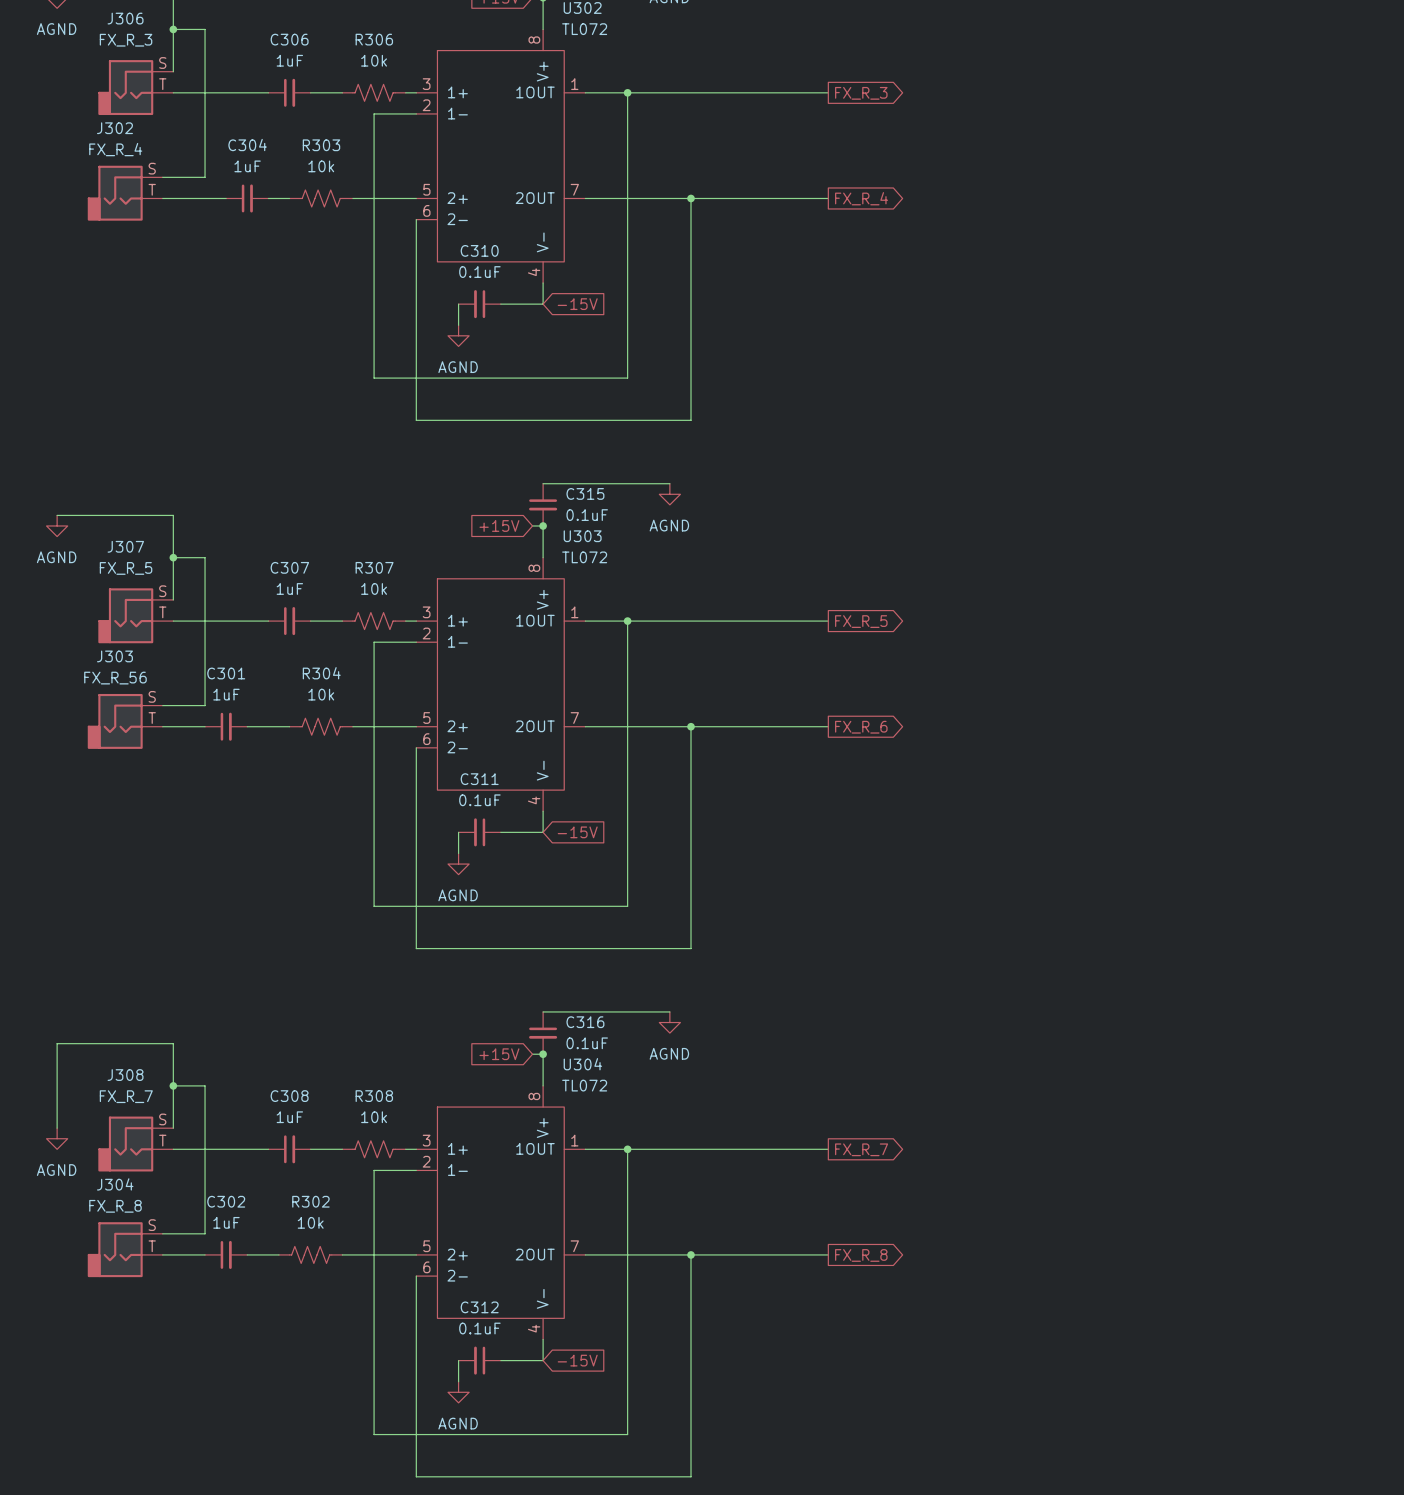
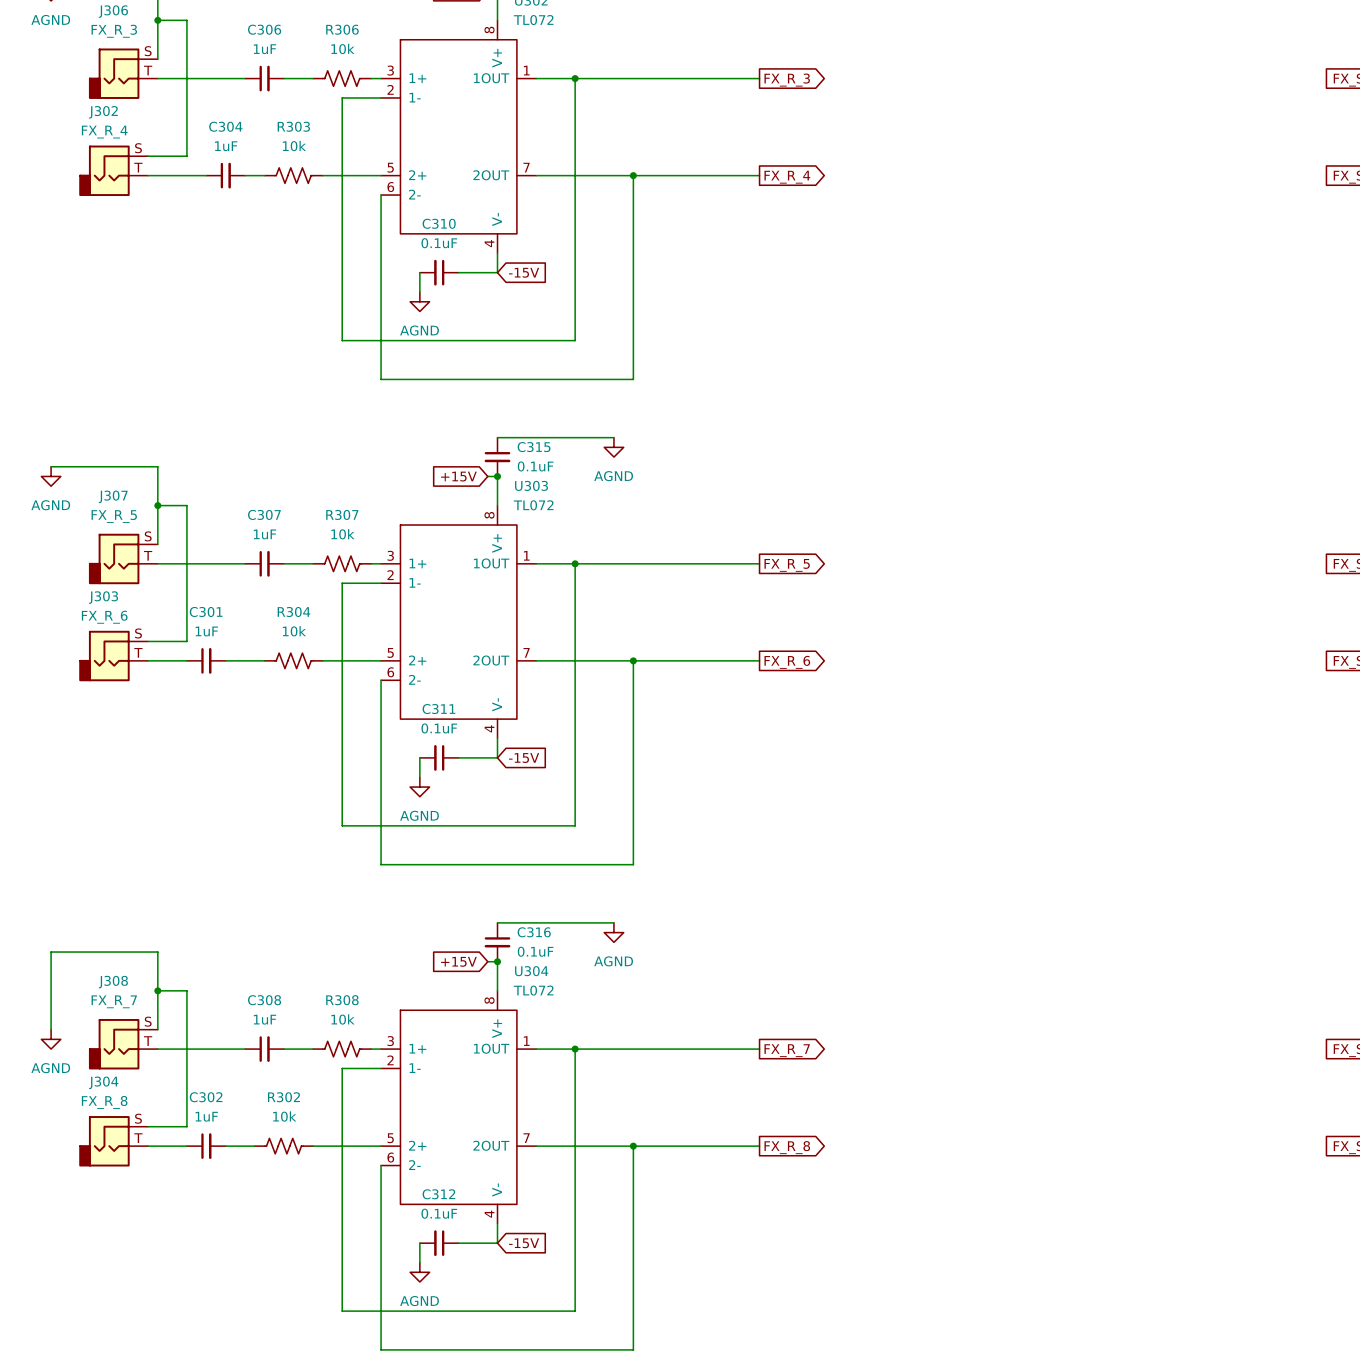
J303 value: FX_R_56 (115, 678) -> FX_R_6 (104, 617)

